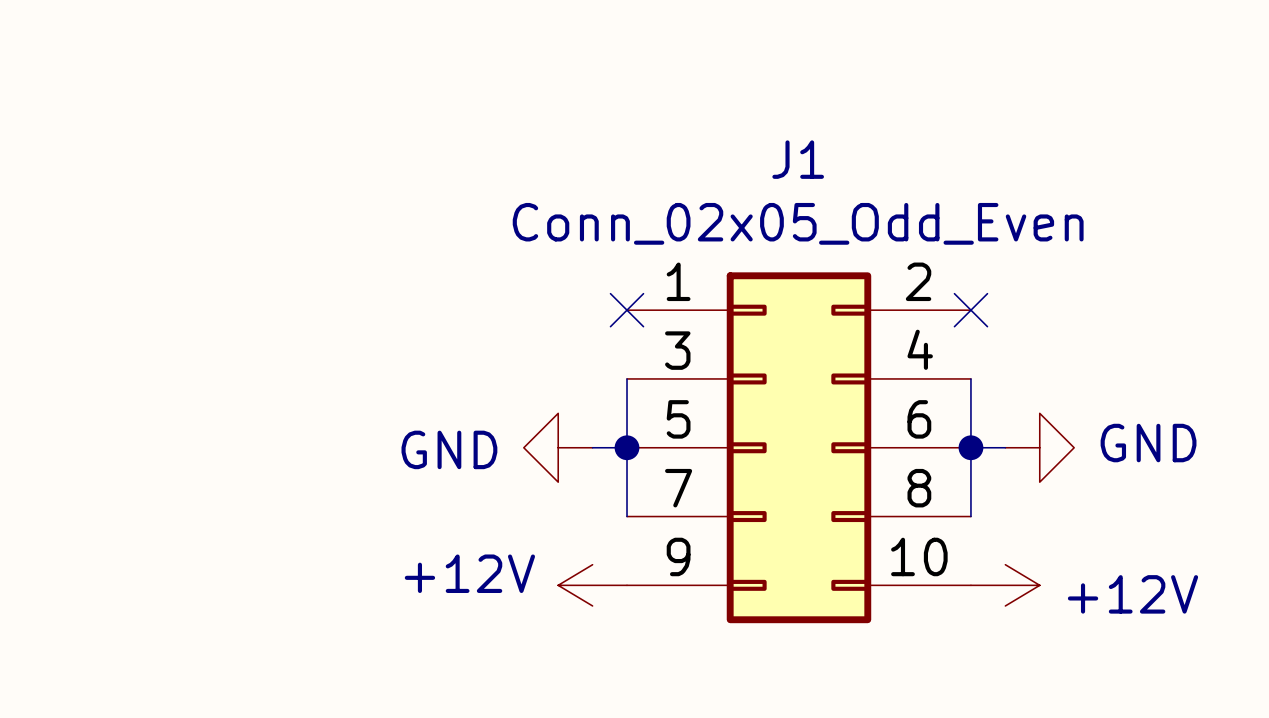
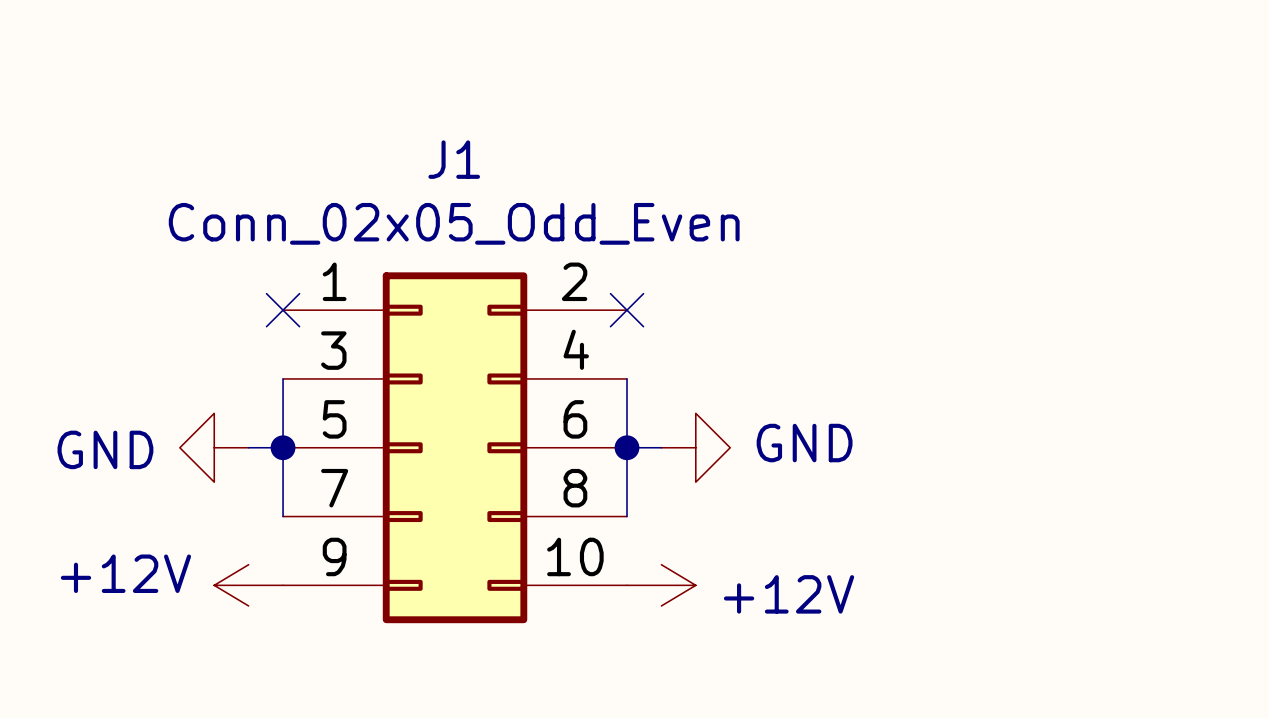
no-connect mark: none -> (283, 310)
no-connect mark: (970, 310) -> none
wire: none -> (283, 378) (283, 516)
wire: (970, 378) (970, 516) -> none
power symbol: none -> GND (214, 447)
wire: none -> (248, 447) (283, 447)
junction: none -> (283, 447)
power symbol rotation: 0° (558, 447) -> 180° (695, 447)
power symbol position: GND (558, 447) -> GND (695, 447)
J1 position: (798, 447) -> (455, 447)
wire: (970, 447) (1005, 447) -> none
junction: (970, 447) -> none
power symbol: GND (1039, 447) -> none
power symbol: none -> +12V (248, 585)
power symbol rotation: 0° (592, 585) -> 180° (661, 585)
power symbol position: +12V (592, 585) -> +12V (661, 585)
power symbol: +12V (1005, 585) -> none

